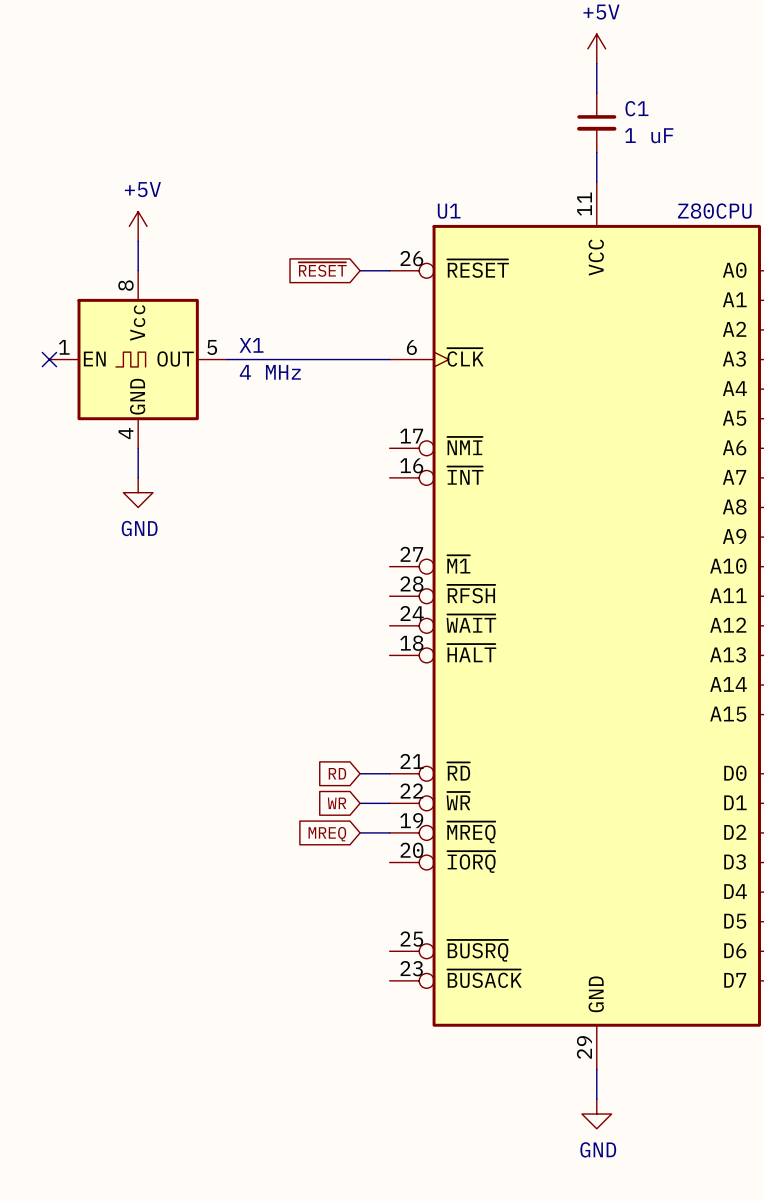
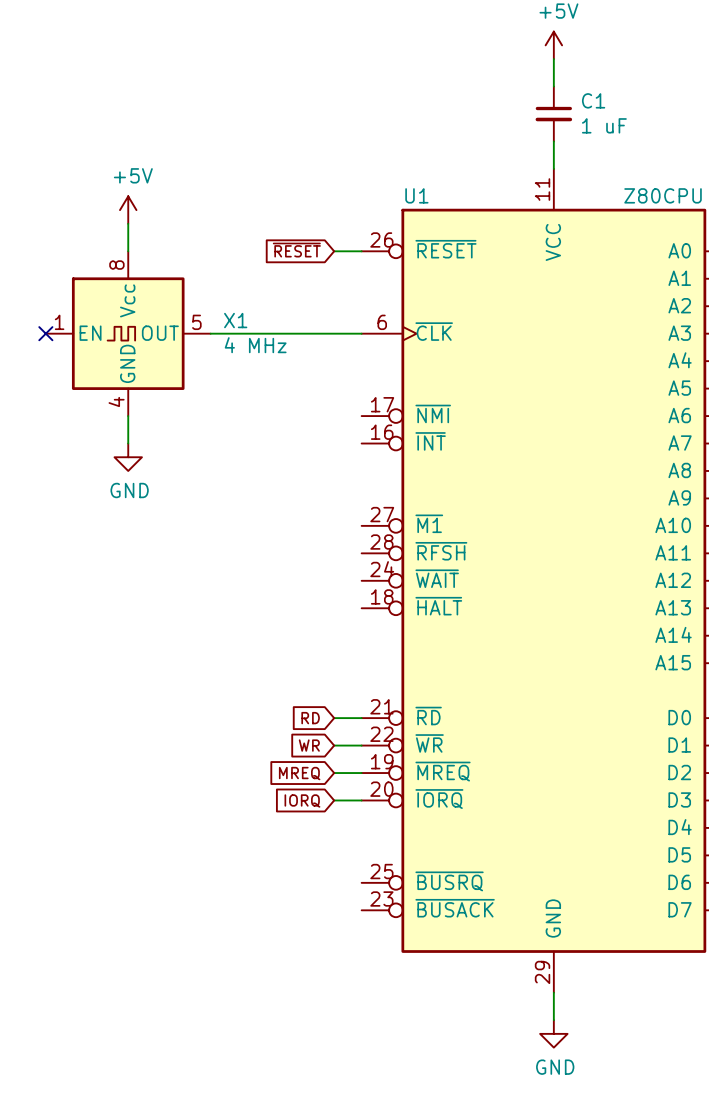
wire: none -> (334, 800) (361, 800)
global label: none -> IORQ (302, 800)

